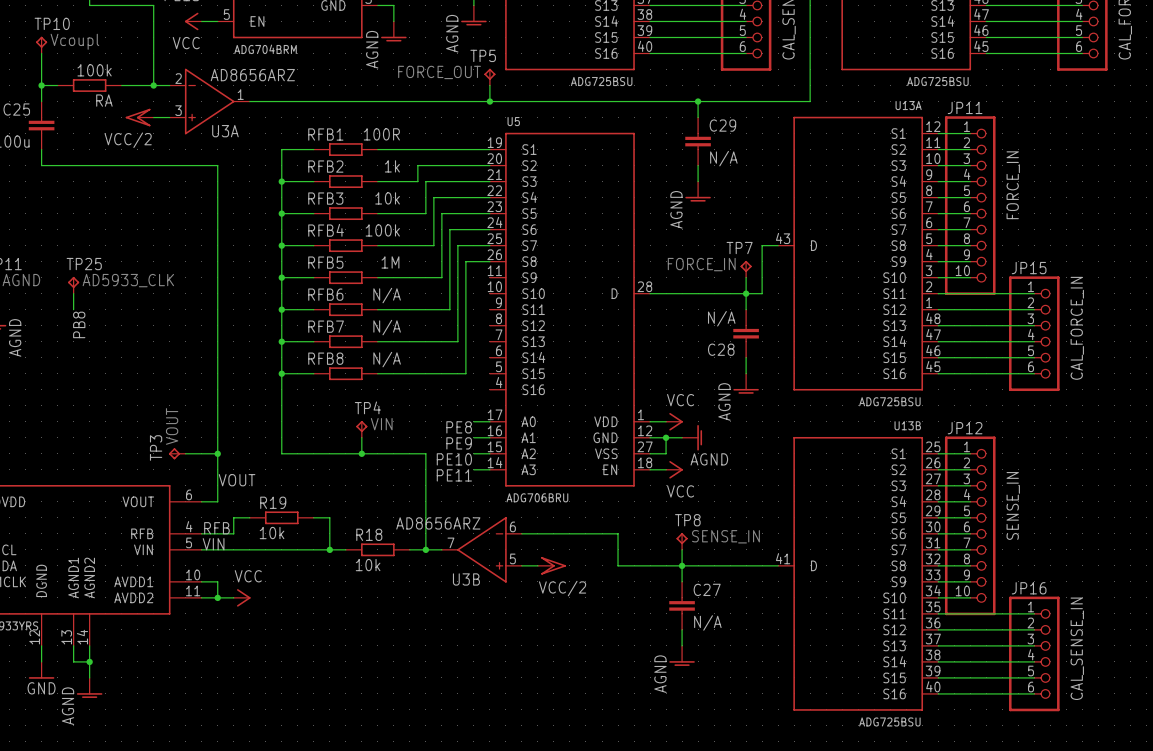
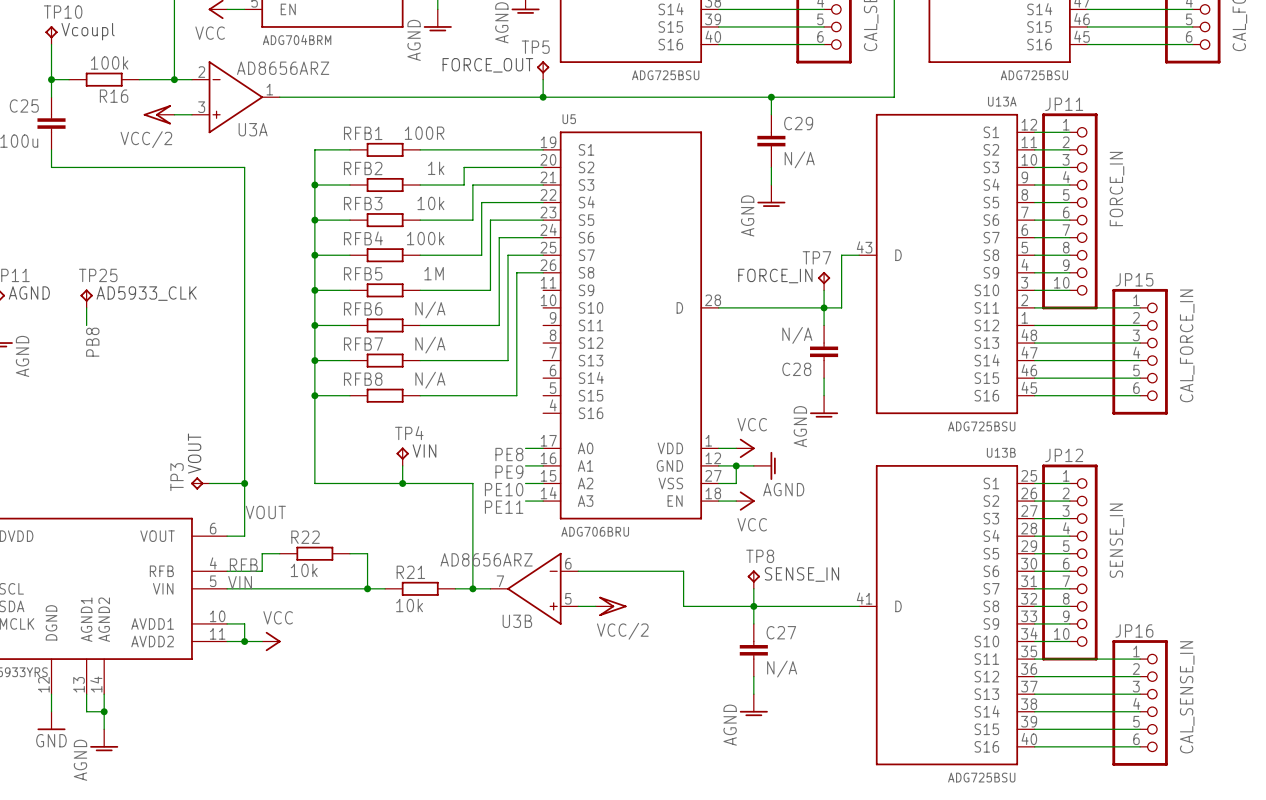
RA name: RA (104, 100) -> R16 (114, 96)
R19 name: R19 (273, 502) -> R22 (305, 537)
R18 name: R18 (369, 534) -> R21 (410, 572)

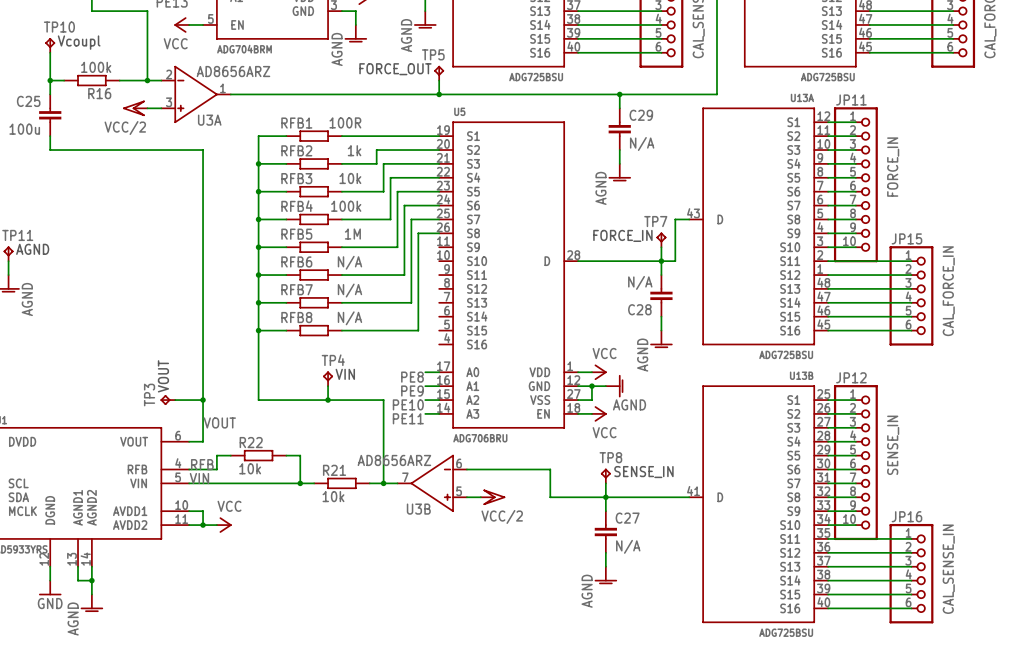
TP25: (86, 298) -> none
wire: (86, 307) (86, 325) -> none
label: PB8 (92, 342) -> none

